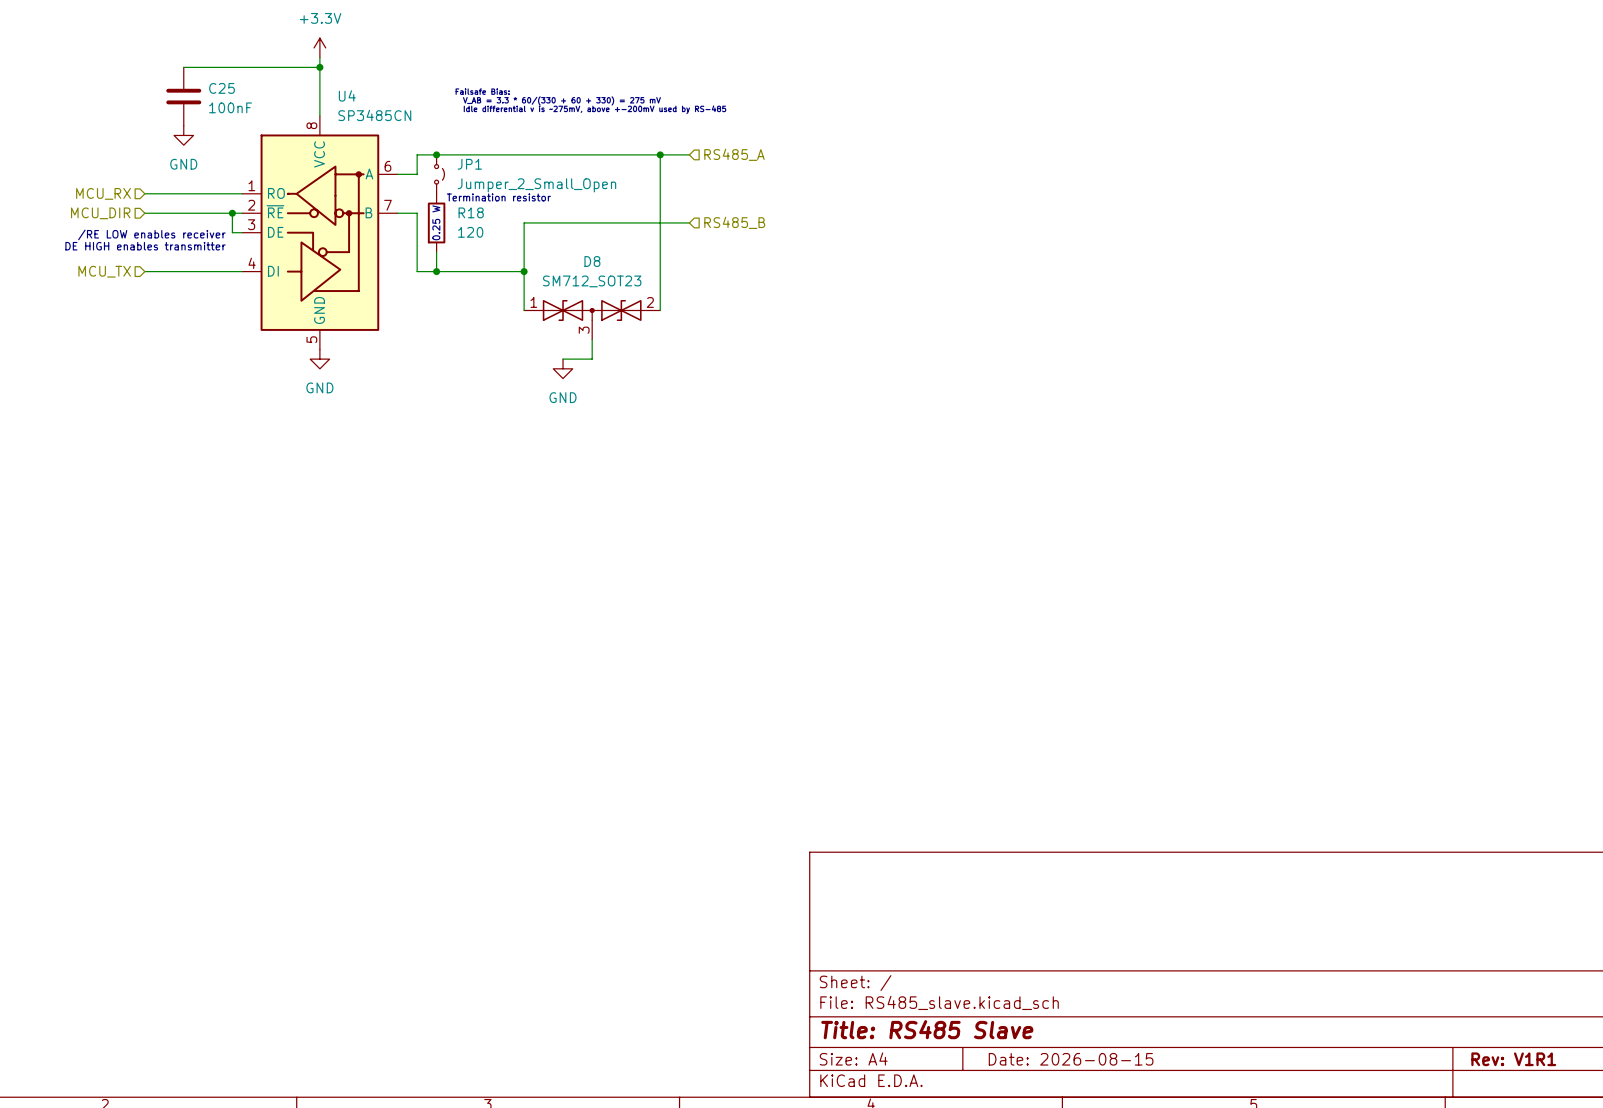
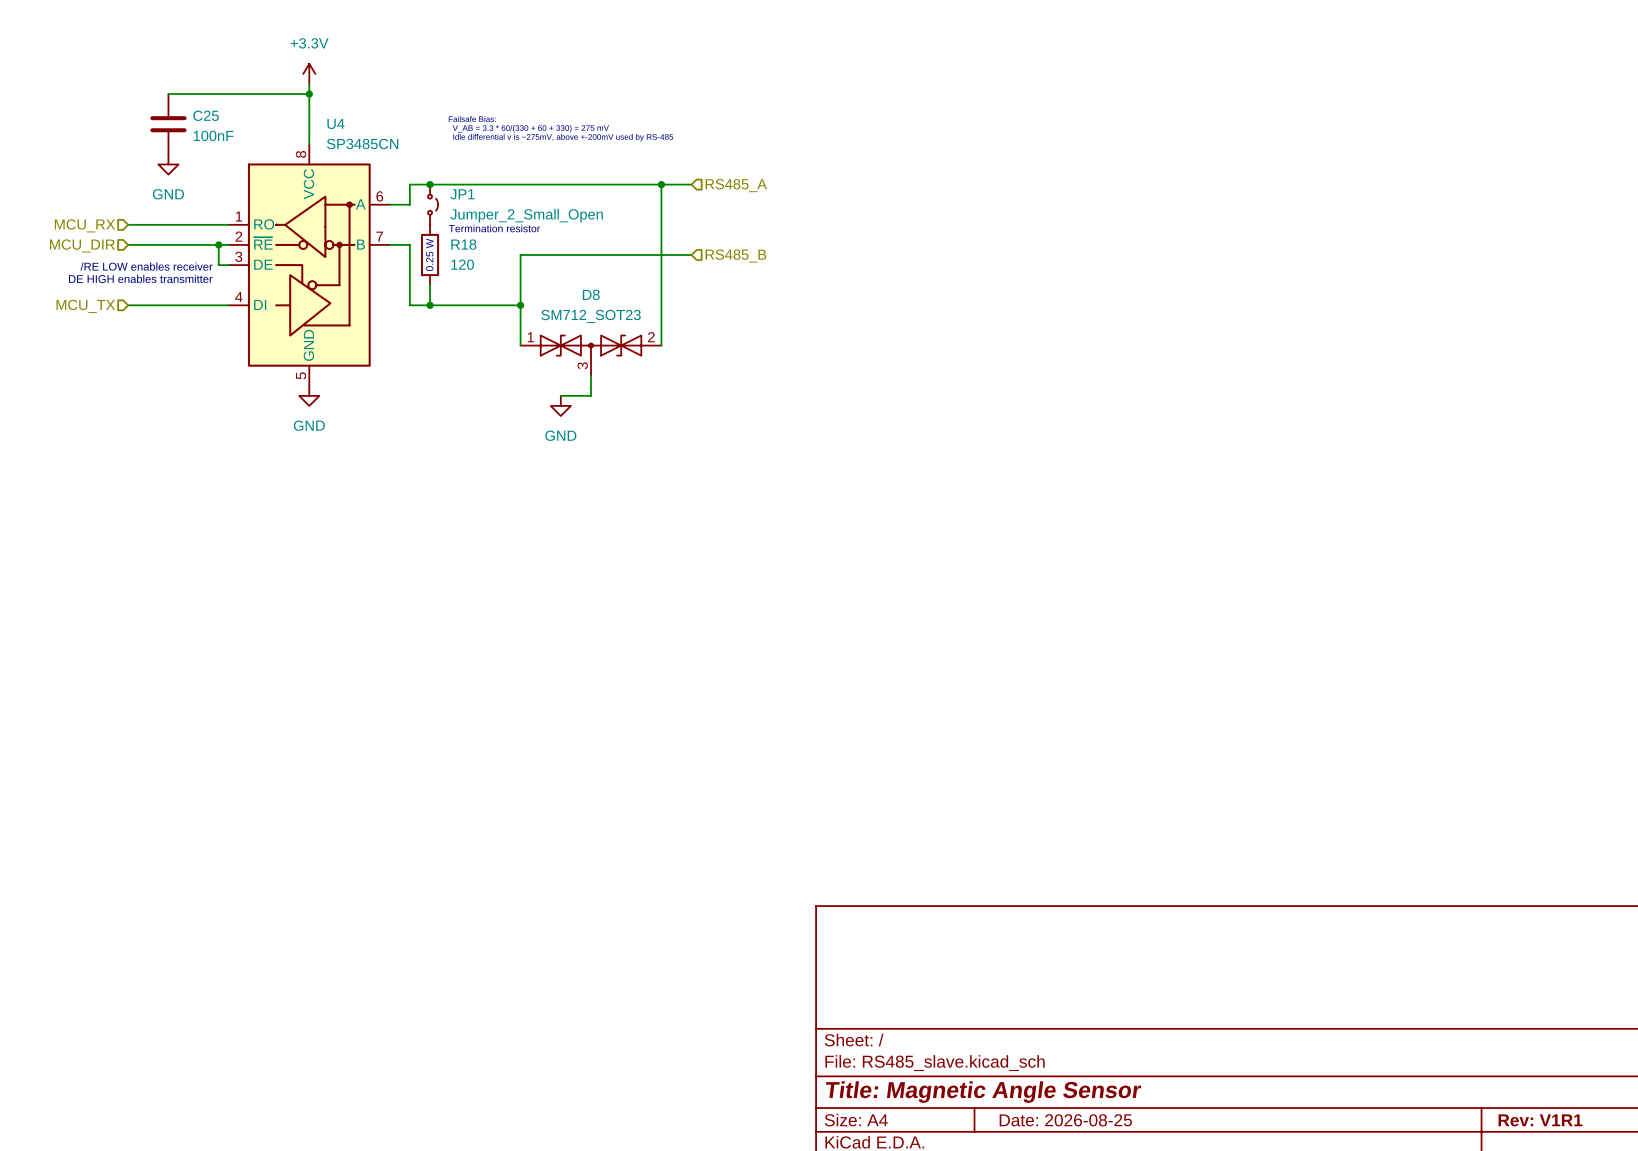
title block: Title: RS485 Slave (927, 1029) -> Title: Magnetic Angle Sensor (983, 1092)
title block: Date: 2026-08-15 (1071, 1059) -> Date: 2026-08-25 (1065, 1120)

